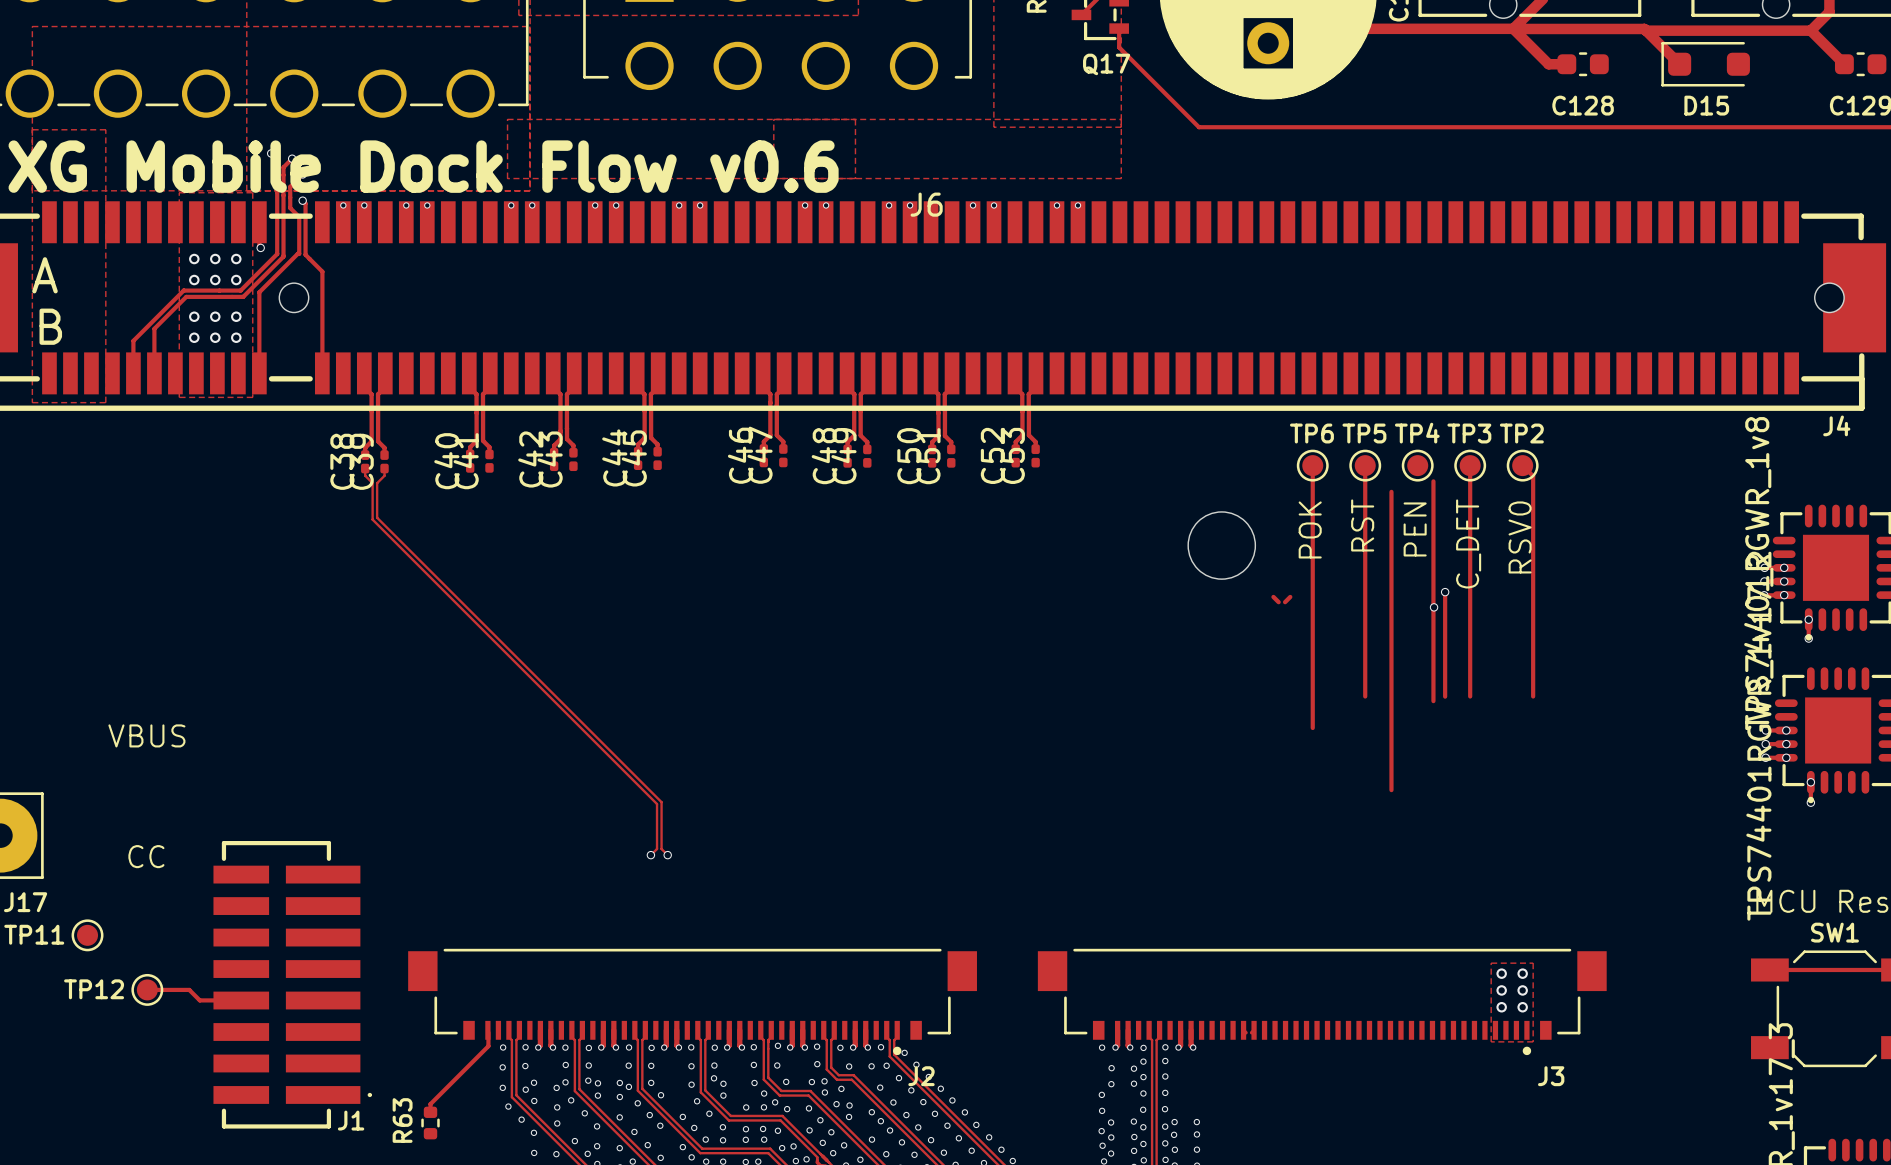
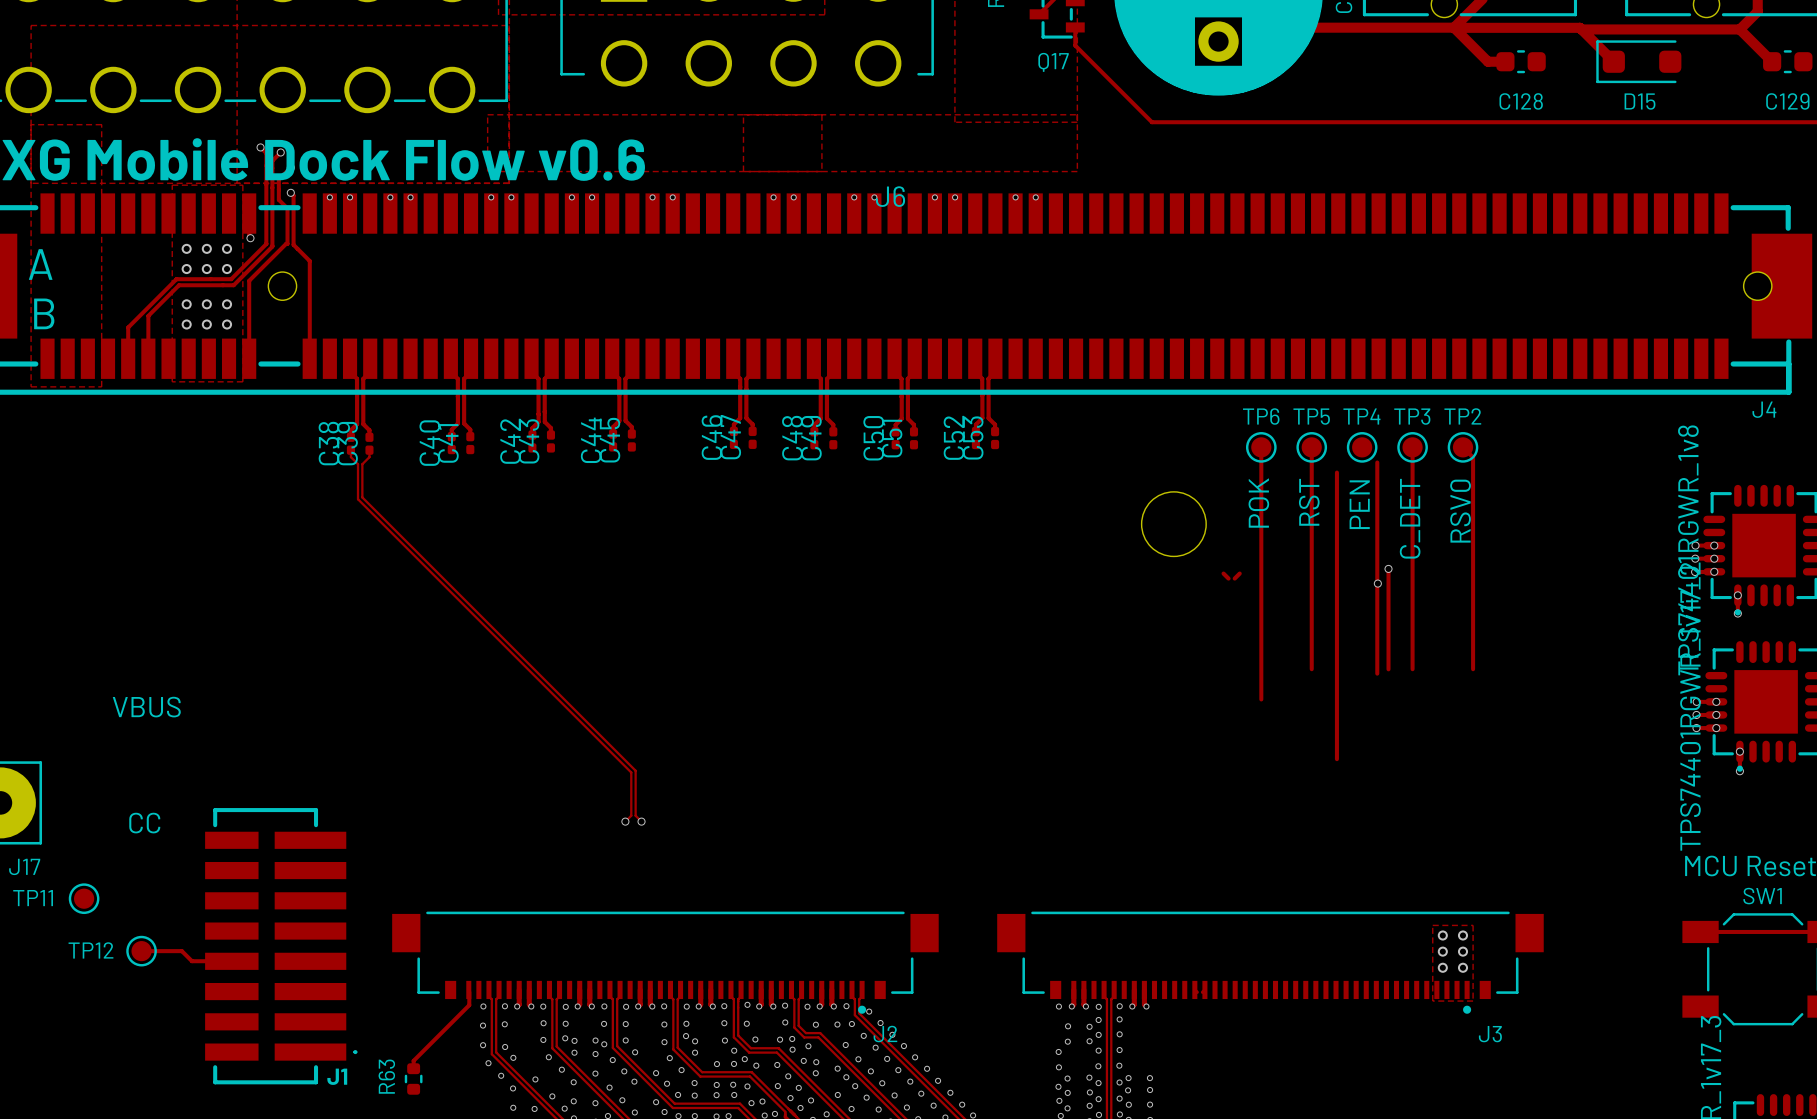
via: (534, 1082) -> none
via: (556, 1087) -> none
via: (557, 1107) -> none

